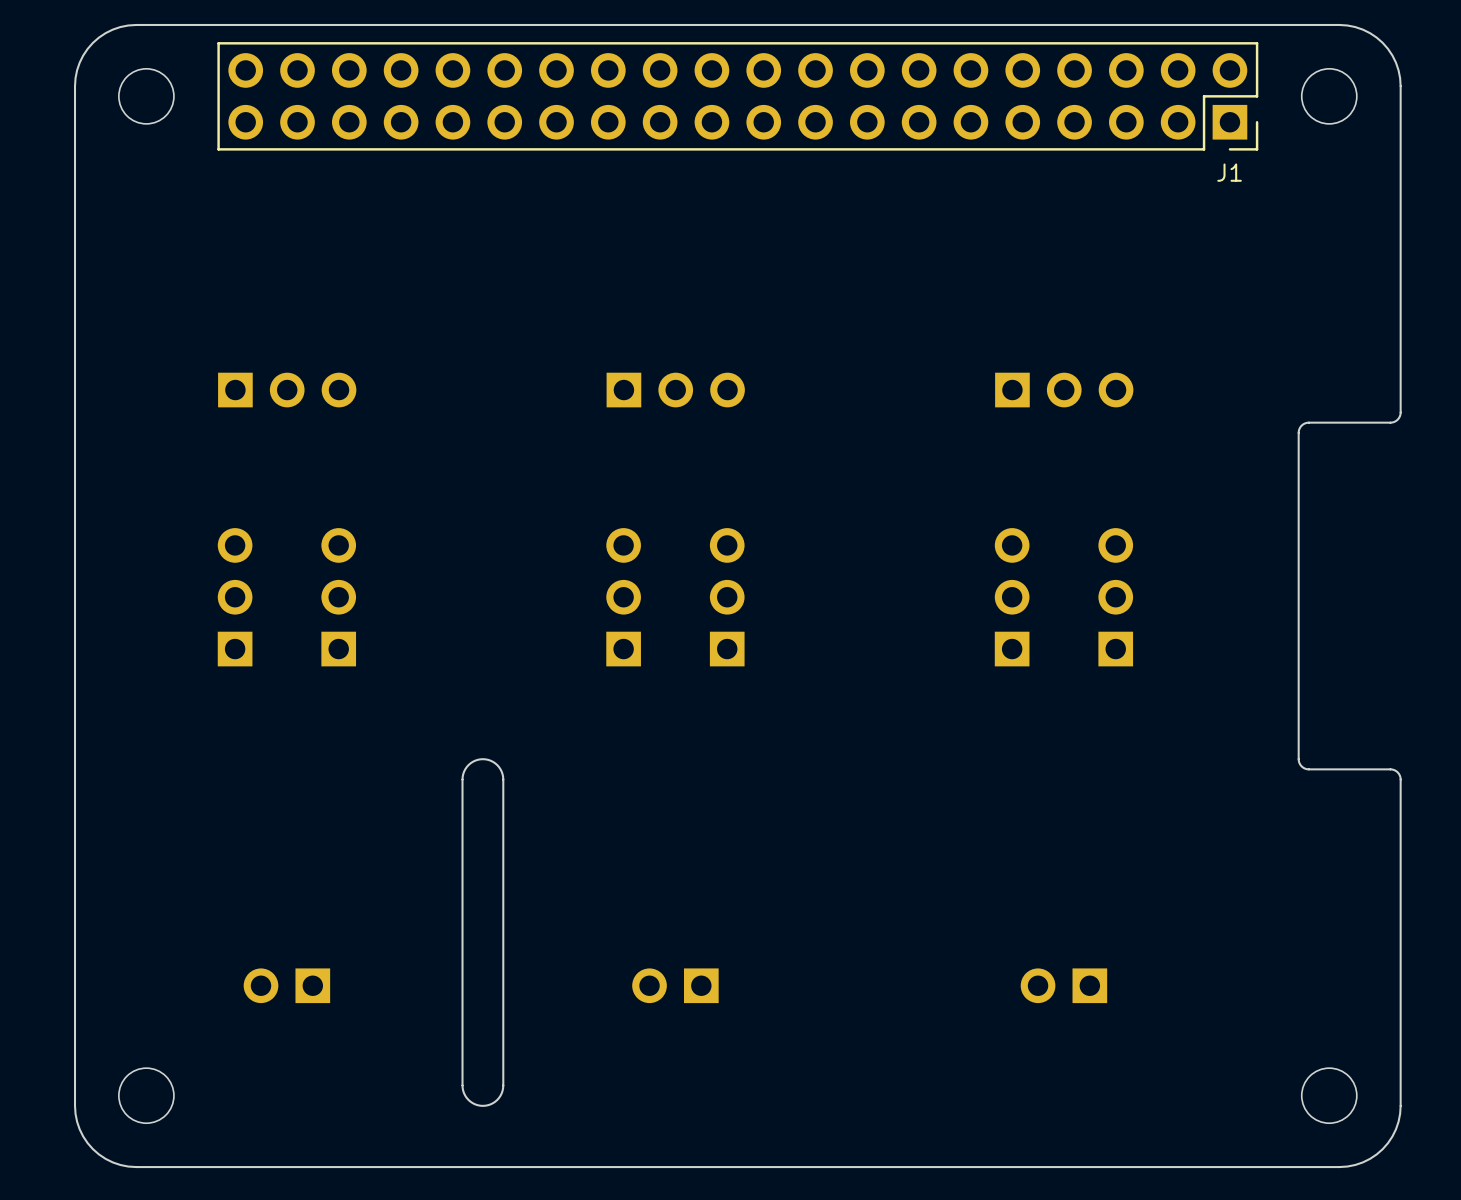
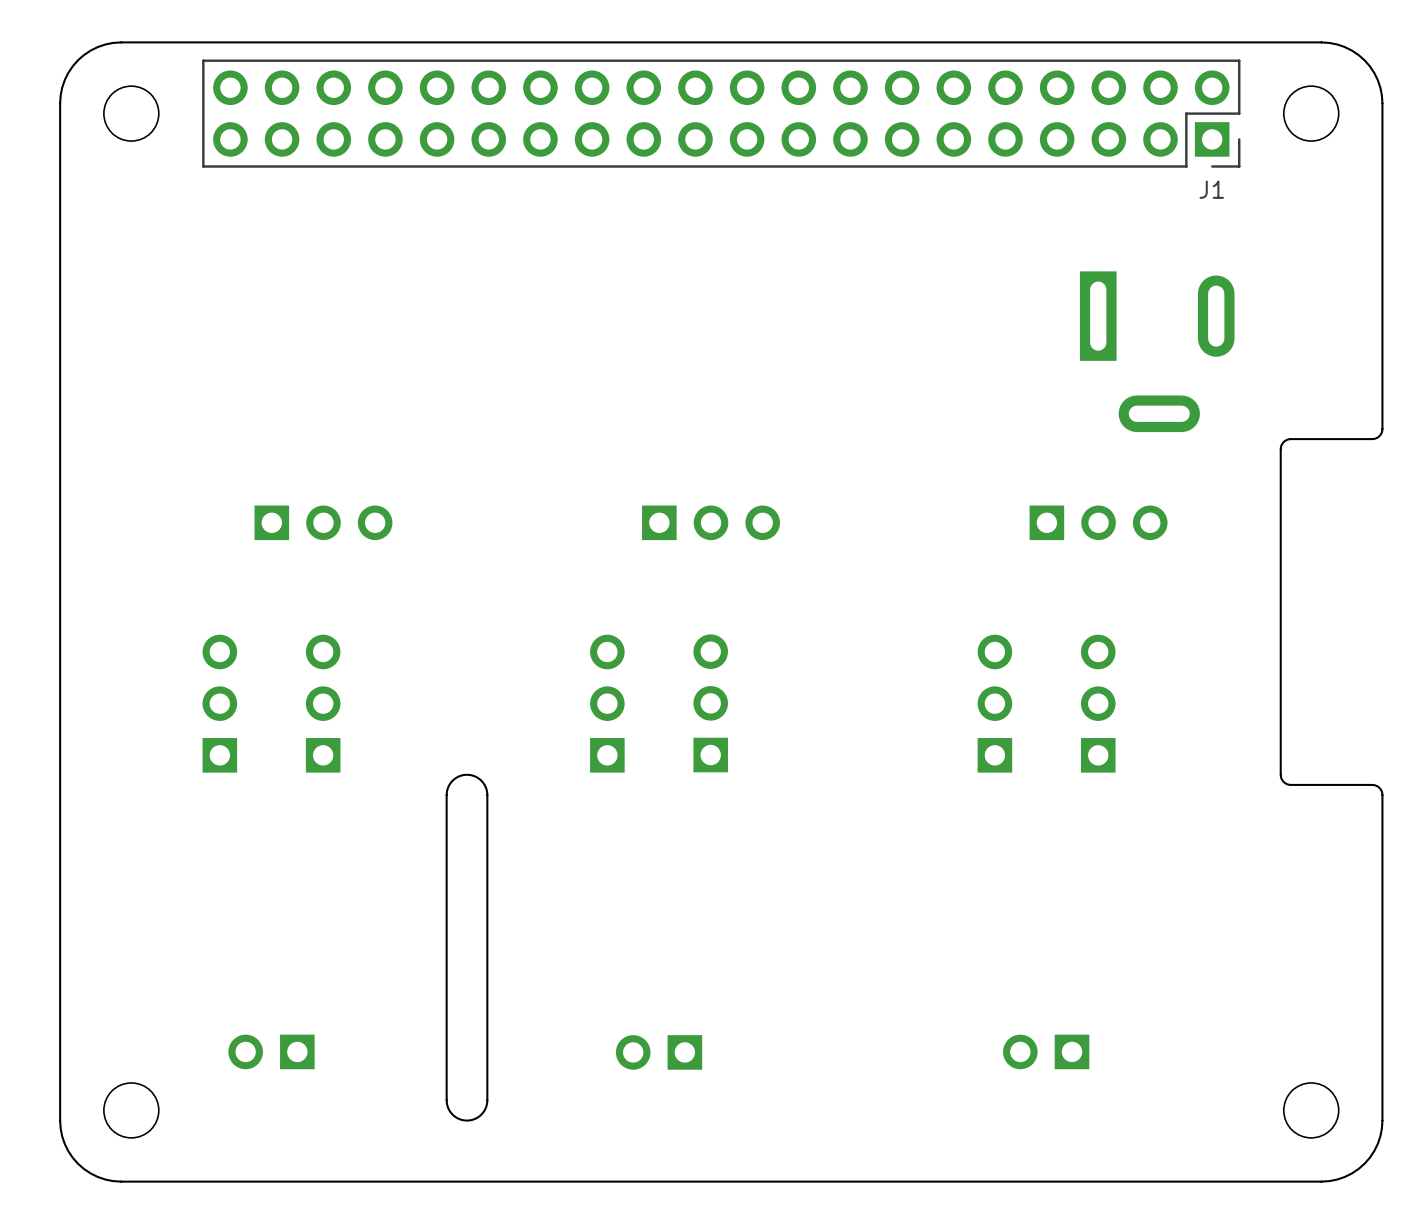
part: none -> (1157, 351)
part: (287, 390) -> none
part: (675, 390) -> none
part: (1064, 390) -> none
part: none -> (323, 522)
part: none -> (711, 522)
part: none -> (1098, 522)
part: (235, 597) -> none
part: (338, 597) -> none
part: (623, 597) -> none
part: (727, 597) -> none
part: (1012, 597) -> none
part: (1115, 597) -> none
part: none -> (219, 703)
part: none -> (323, 703)
part: none -> (607, 703)
part: none -> (710, 703)
part: none -> (994, 703)
part: none -> (1098, 703)
part position: (286, 985) -> (271, 1051)
part position: (675, 985) -> (659, 1052)
part position: (1063, 985) -> (1046, 1051)

